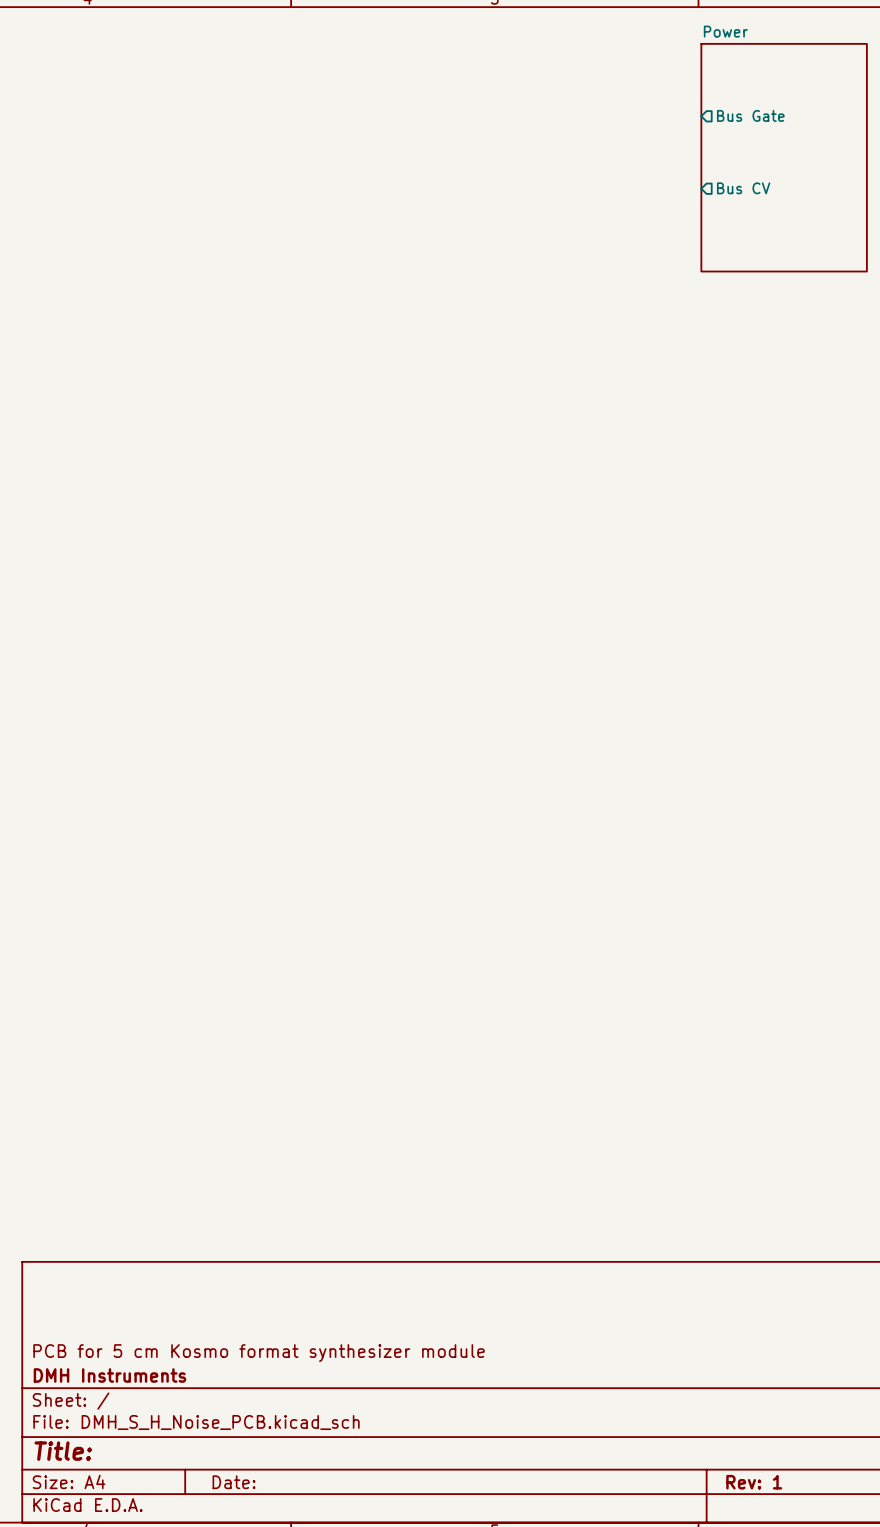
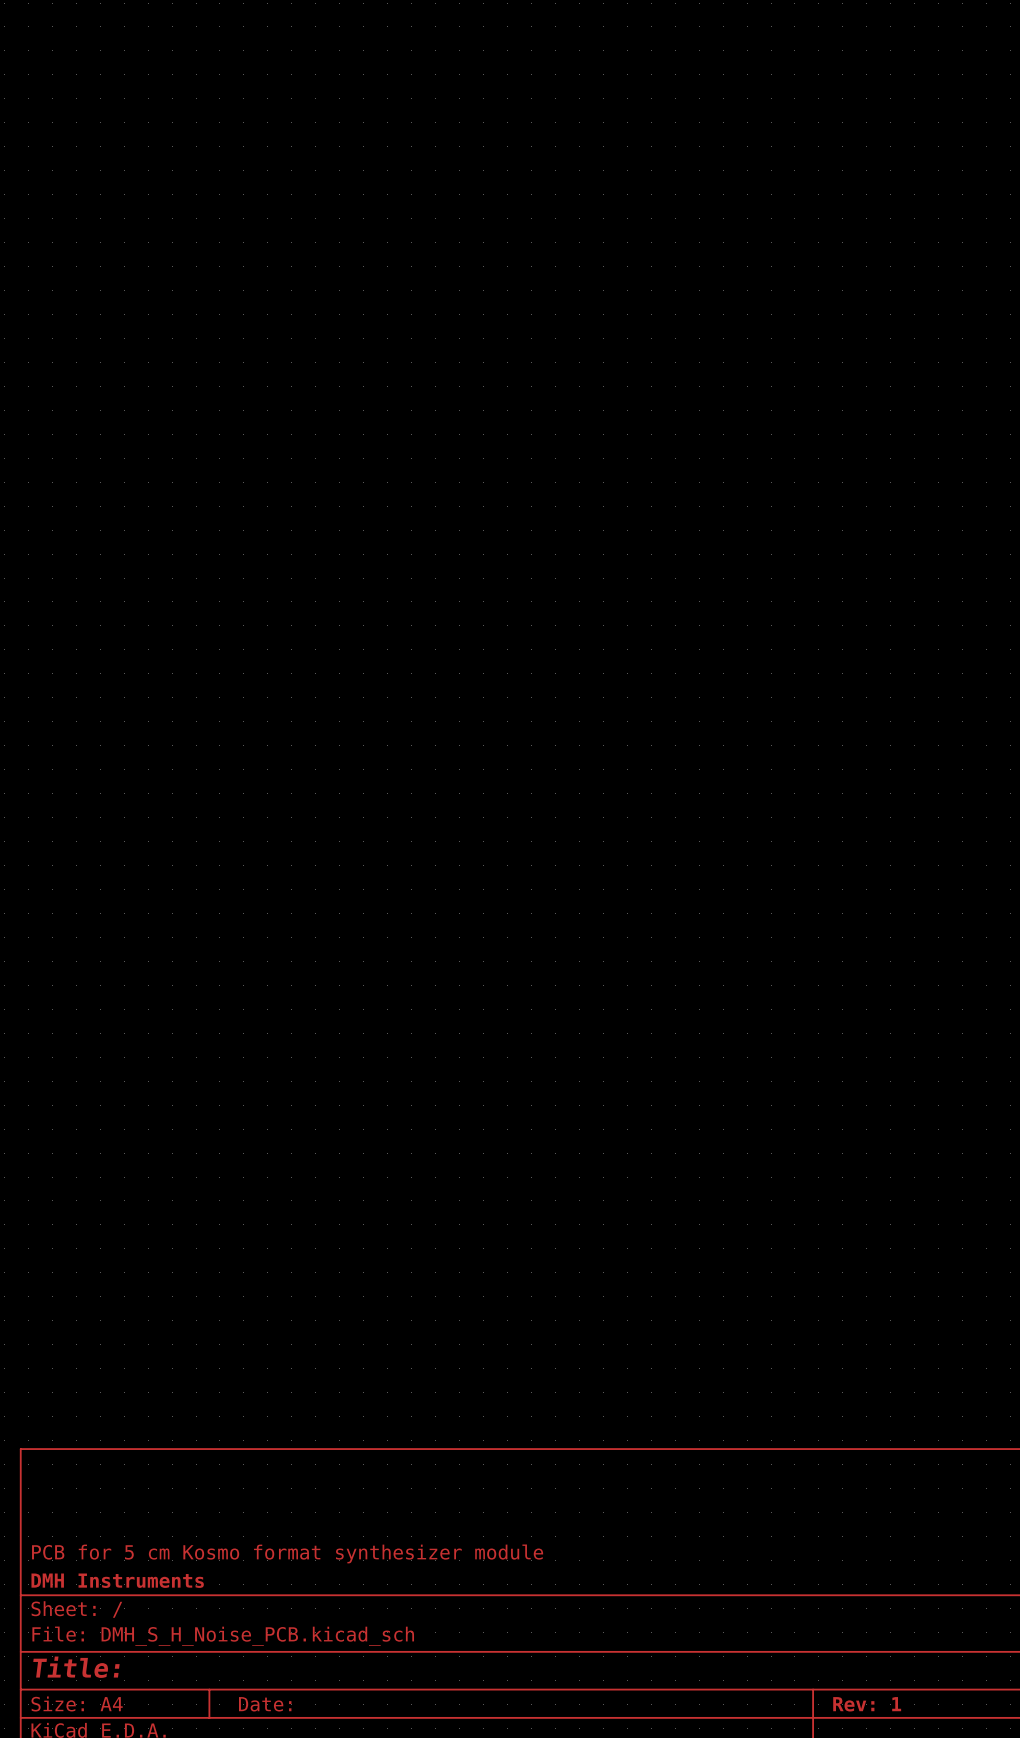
sheet pin: Bus Gate (750, 115) -> none
sheet Power: (784, 157) -> none
sheet pin: Bus CV (743, 188) -> none

